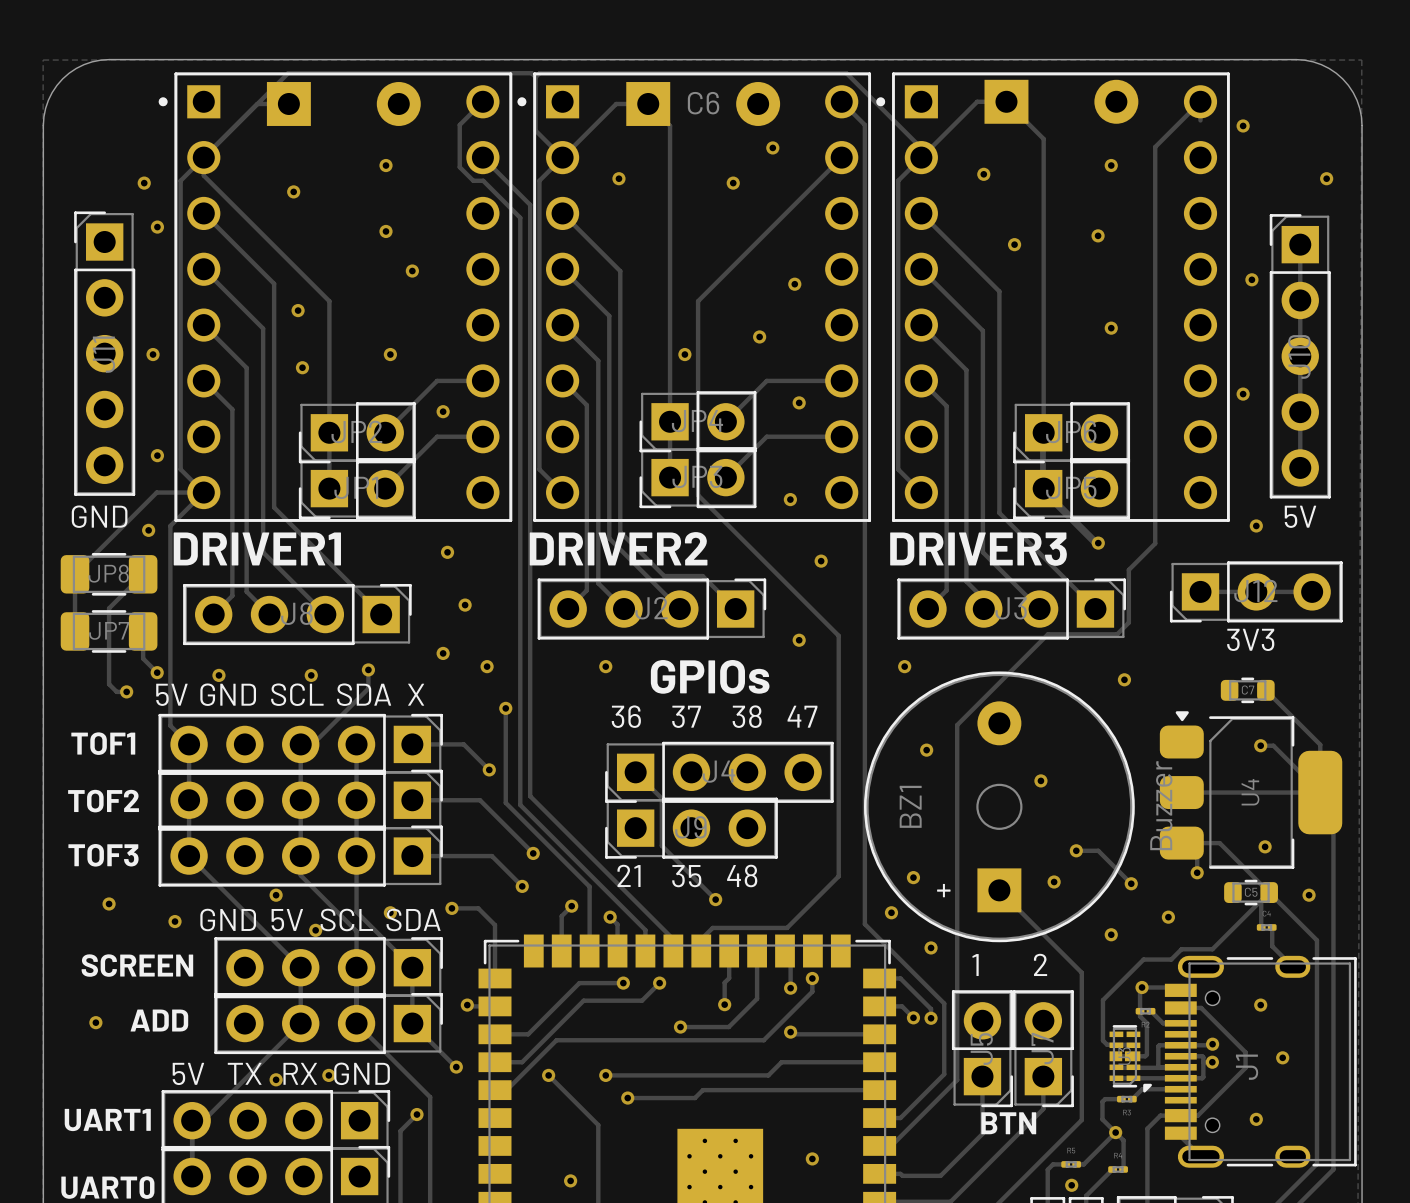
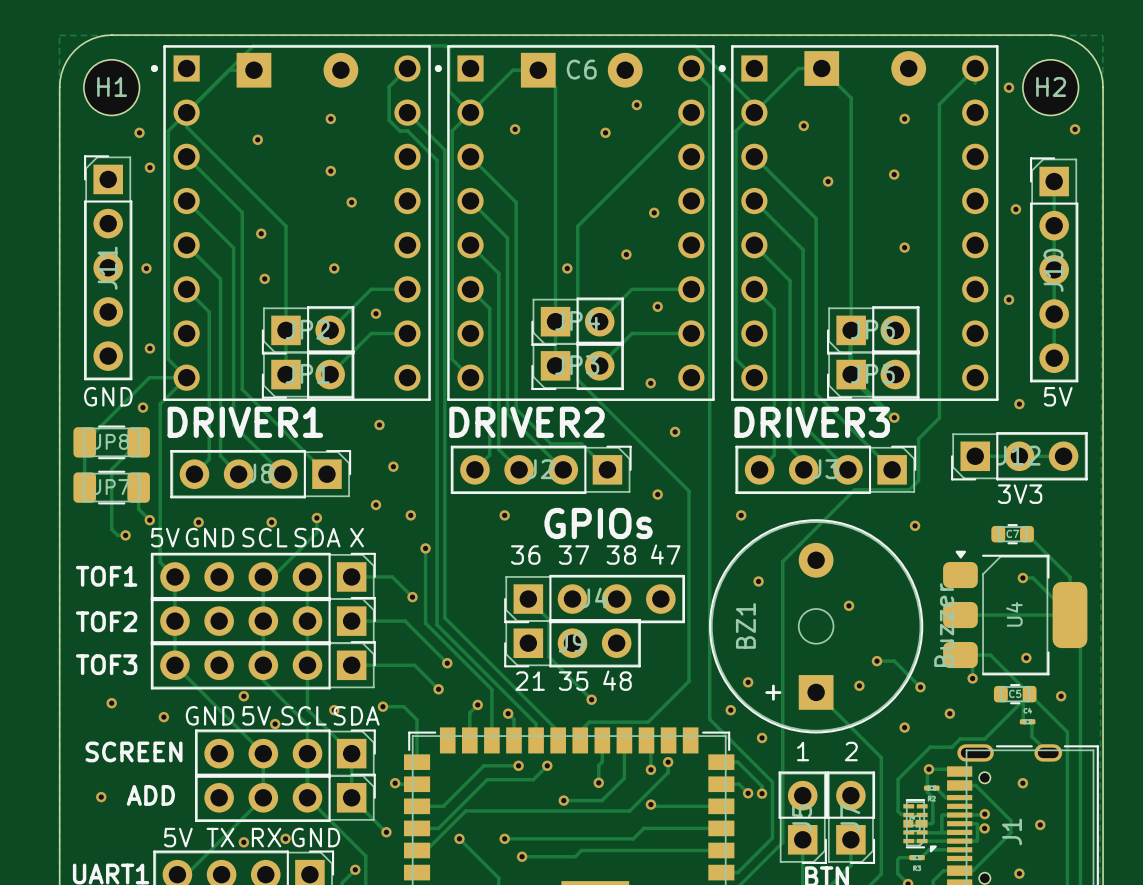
H1: none -> (111, 87)
H2: none -> (1050, 87)

